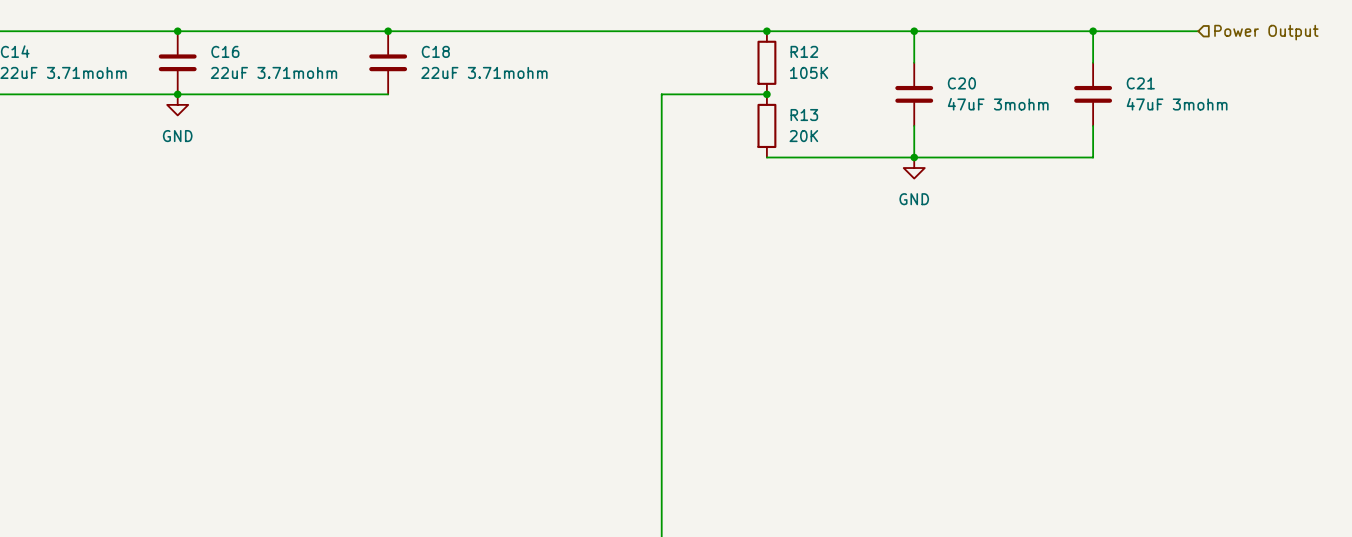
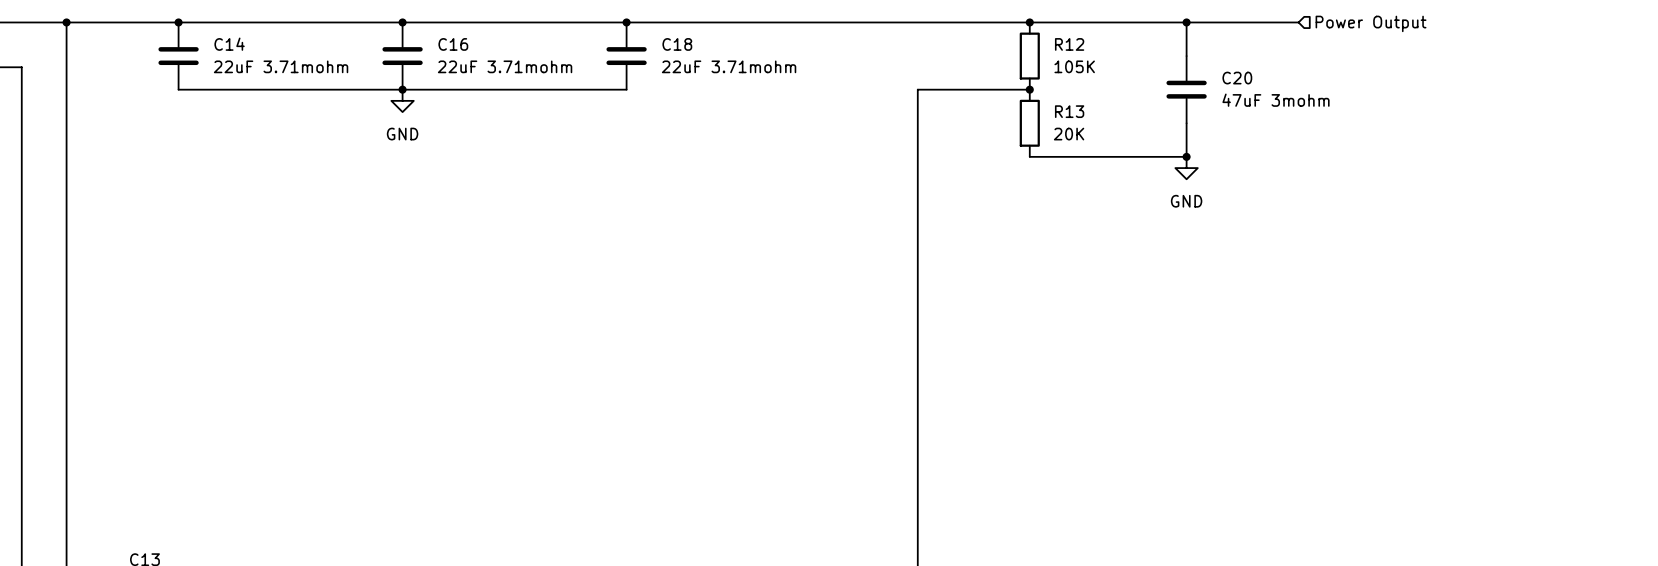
wire: (1019, 31) (1198, 31) -> none
wire: (1093, 31) (1093, 62) -> none
junction: (1093, 31) -> none
hierarchical label position: Power Output (1266, 32) -> Power Output (1371, 23)
C21: 47uF 3mohm (1093, 94) -> none
wire: (1093, 125) (1093, 157) (914, 157) -> none

